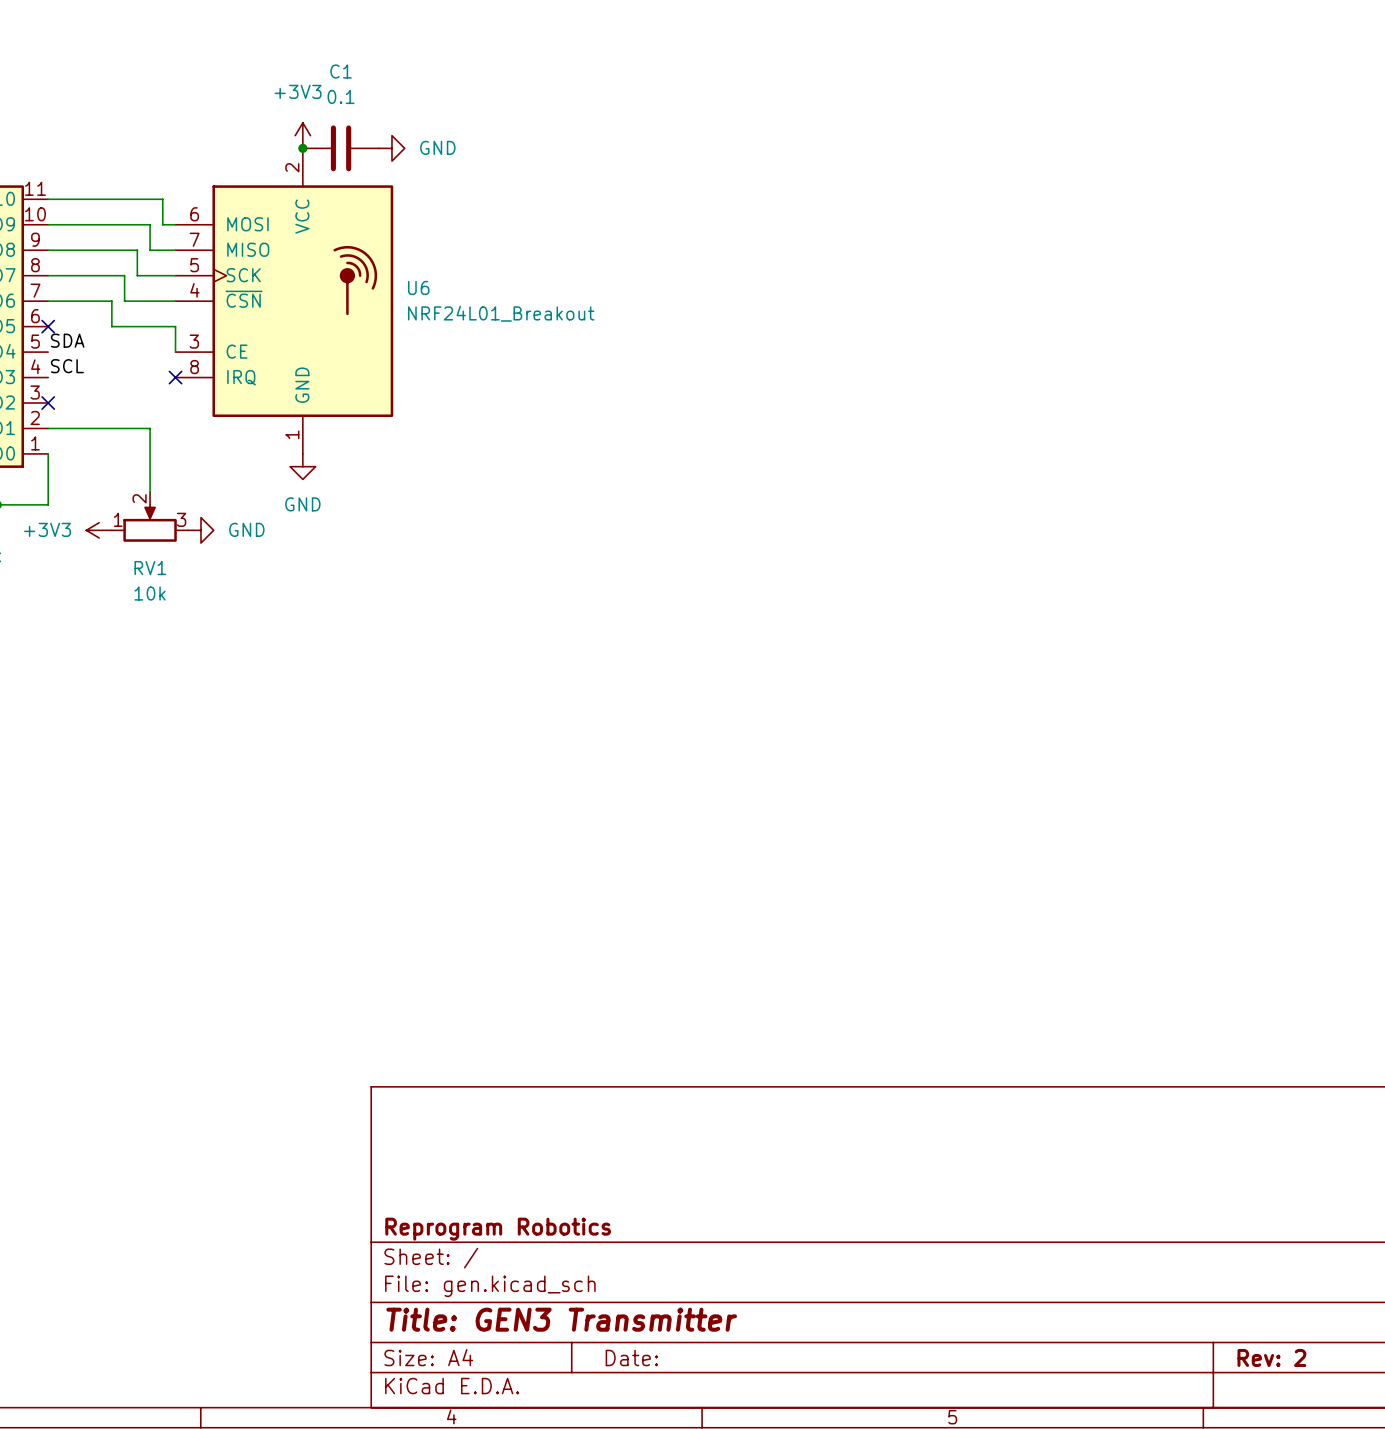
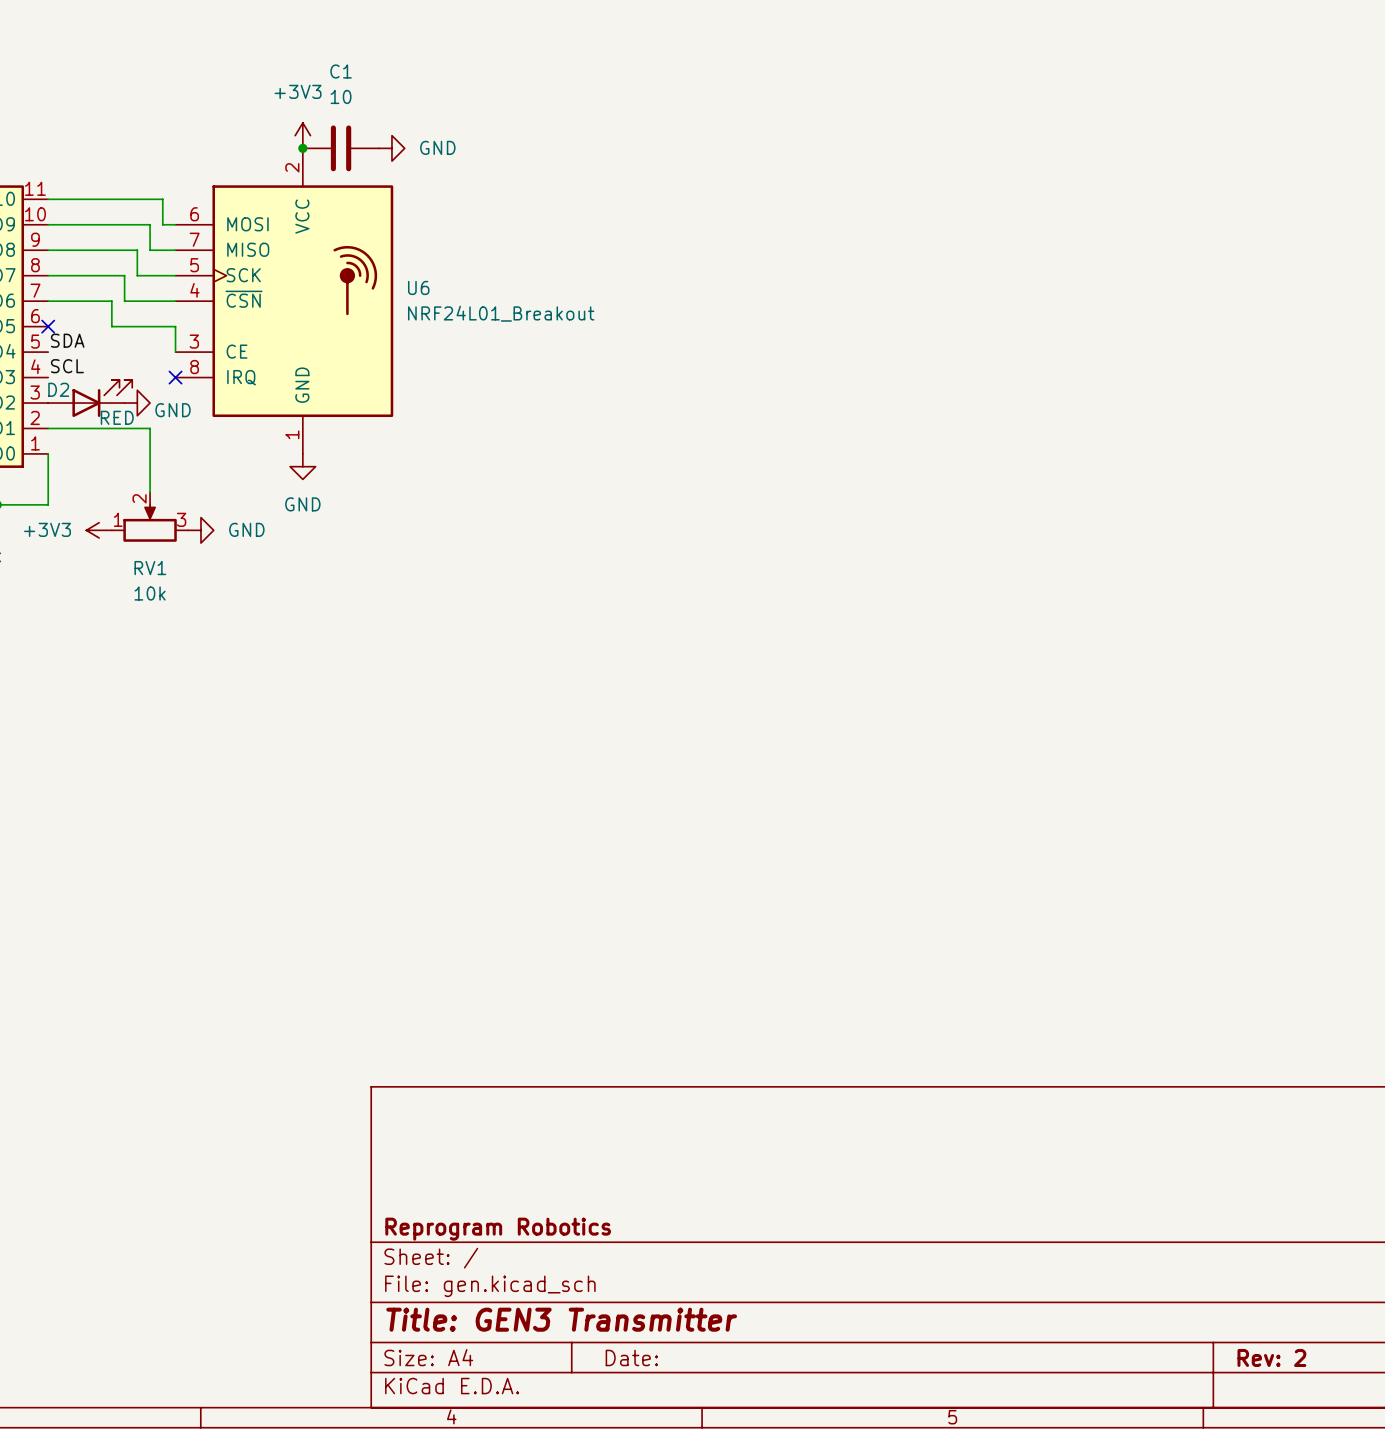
C1 value: 0.1 (341, 96) -> 10 (341, 96)
D2: none -> RED (90, 398)
no-connect mark: (48, 403) -> none
power symbol: none -> GND (137, 403)

